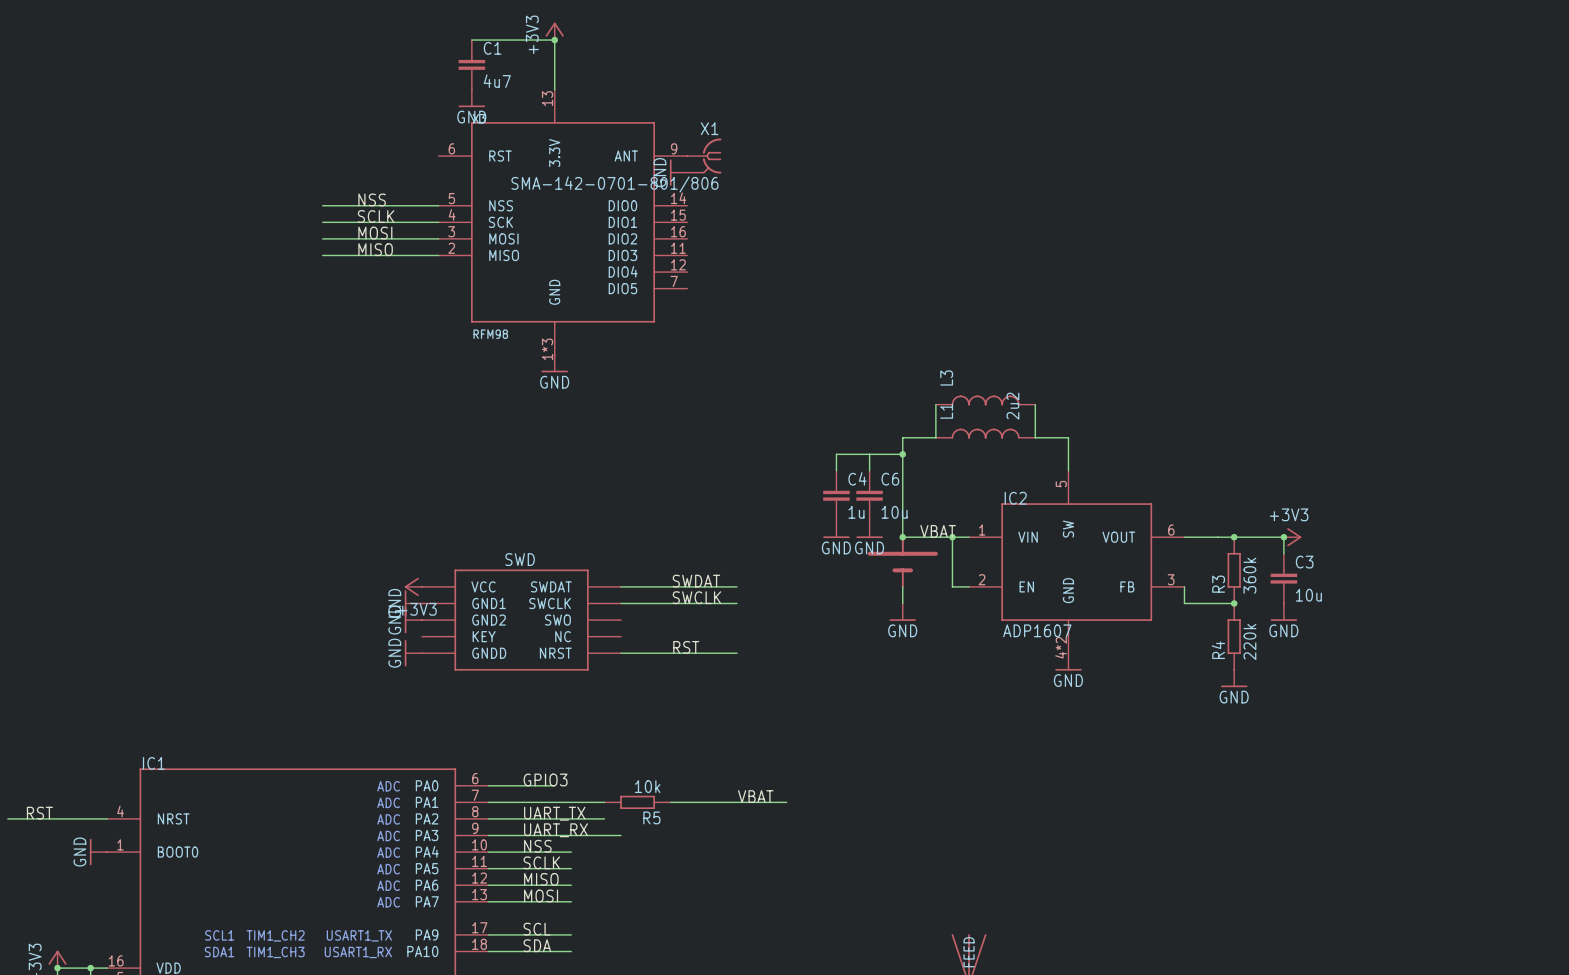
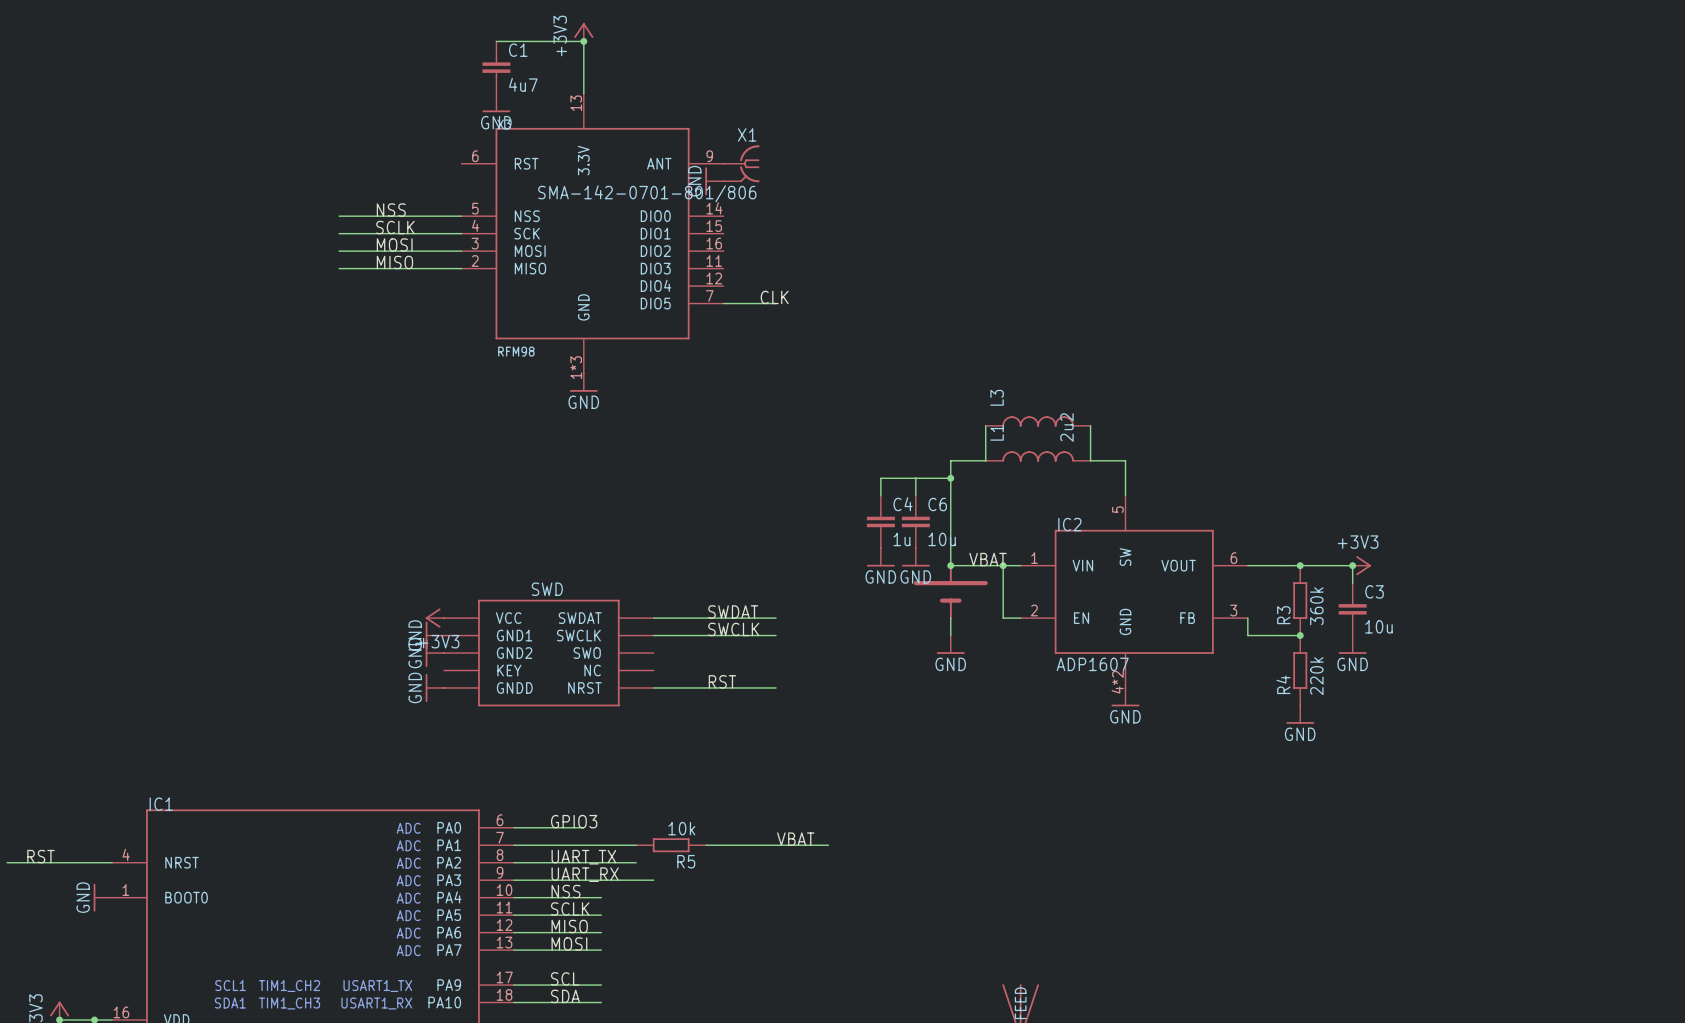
label: none -> CLK (774, 297)
wire: none -> (723, 303) (776, 303)

